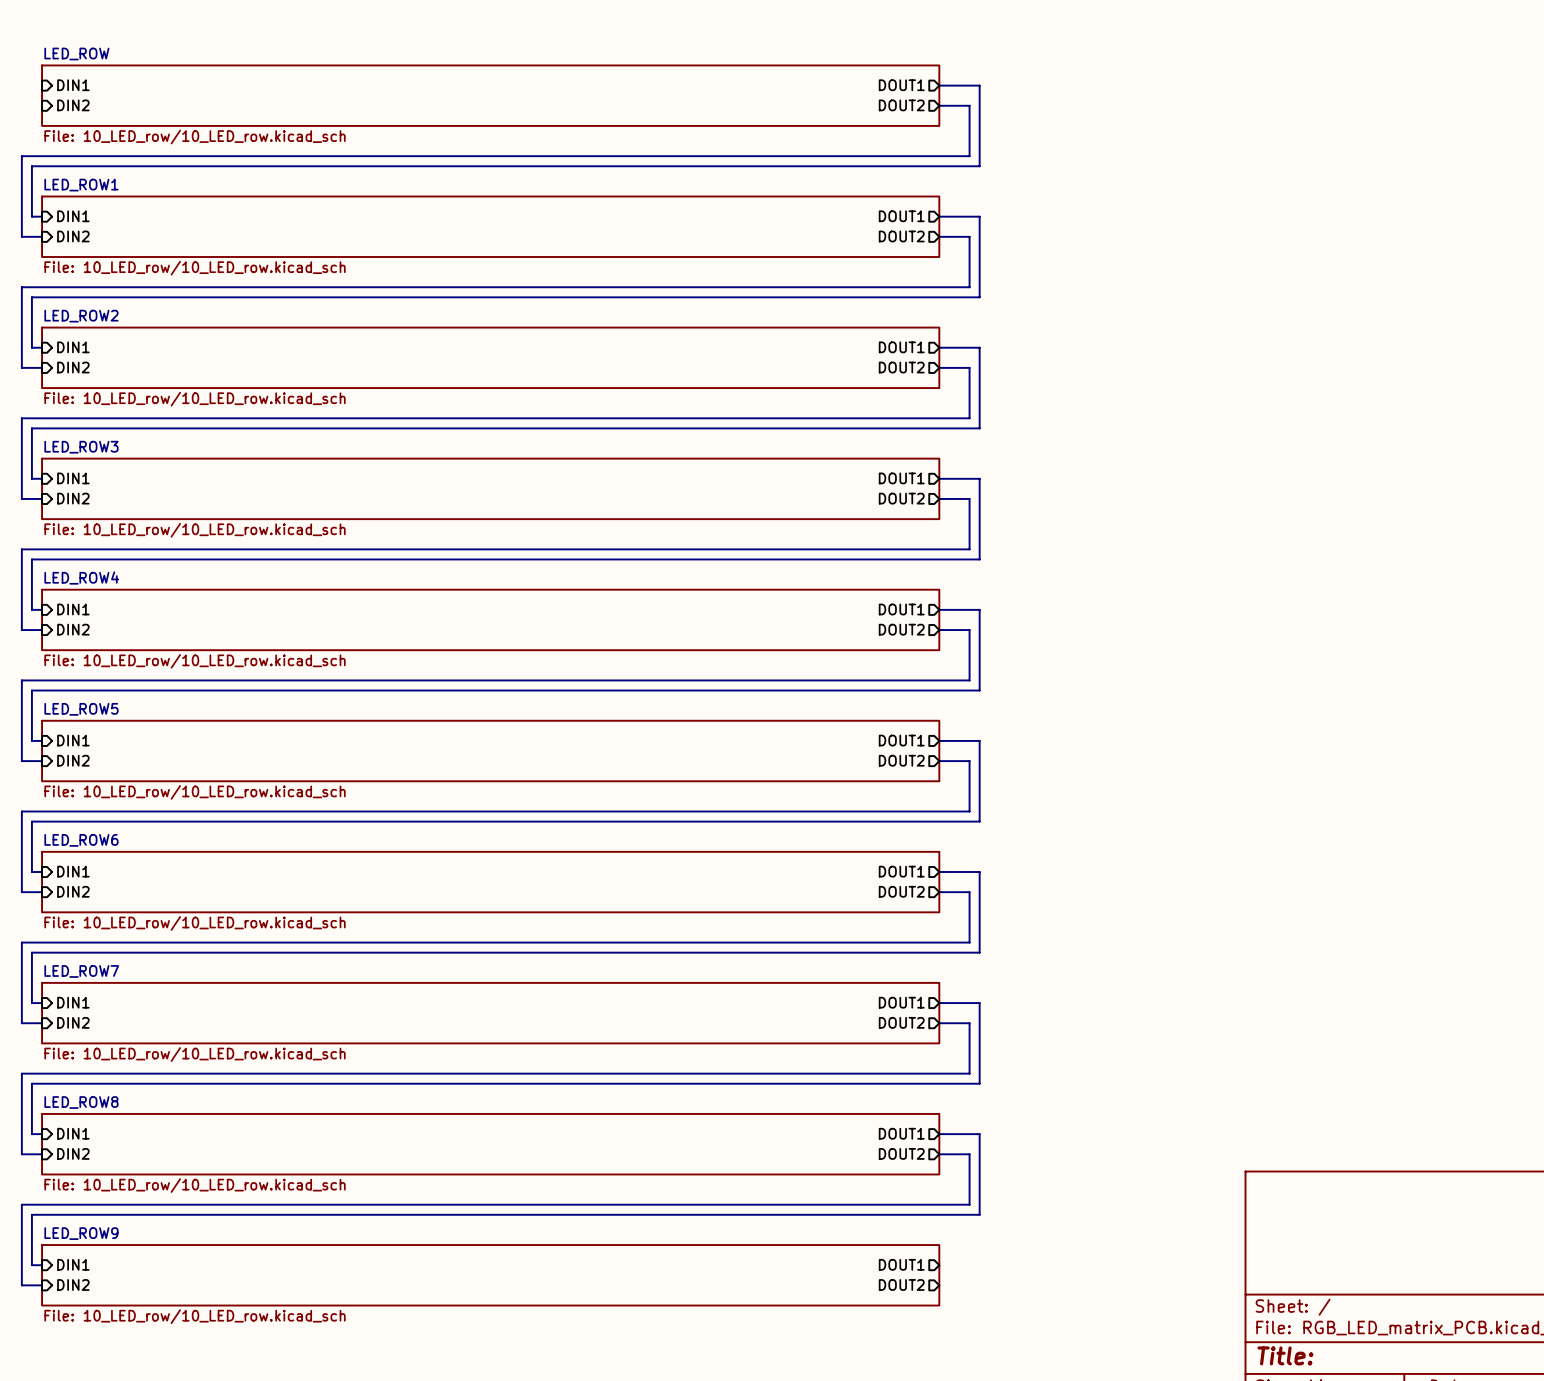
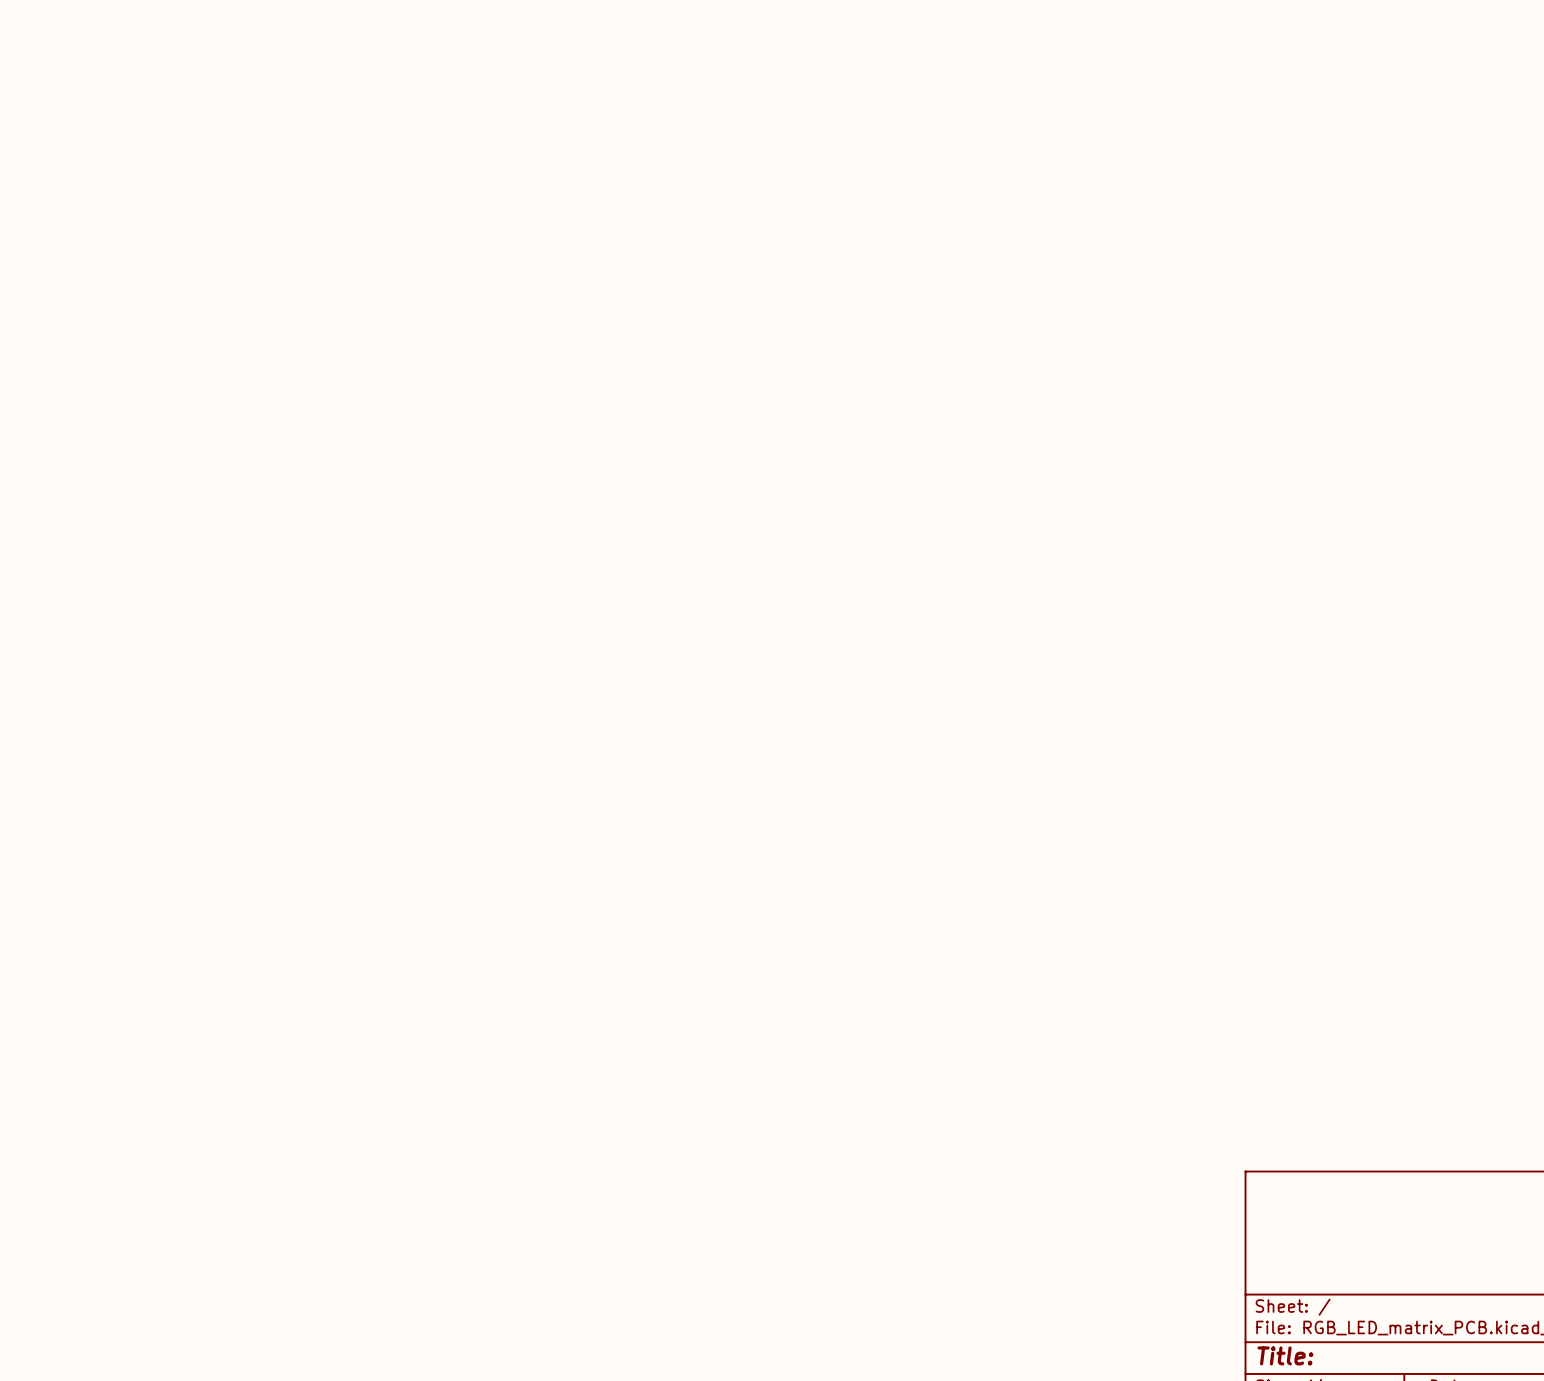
sheet pin: DIN1 (73, 85) -> none
sheet pin: DOUT1 (901, 85) -> none
wire: (939, 85) (979, 85) (979, 166) (31, 166) (31, 216) (42, 216) -> none
sheet LED_ROW: File: 10_LED_row/10_LED_row.kicad_sch (490, 95) -> none
sheet pin: DIN2 (73, 105) -> none
sheet pin: DOUT2 (901, 105) -> none
wire: (939, 105) (969, 105) (969, 156) (21, 156) (21, 236) (42, 236) -> none
sheet pin: DIN1 (73, 216) -> none
sheet pin: DOUT1 (901, 216) -> none
wire: (939, 216) (979, 216) (979, 297) (31, 297) (31, 347) (42, 347) -> none
sheet LED_ROW1: File: 10_LED_row/10_LED_row.kicad_sch (490, 226) -> none
sheet pin: DIN2 (73, 236) -> none
sheet pin: DOUT2 (901, 236) -> none
wire: (939, 236) (969, 236) (969, 287) (21, 287) (21, 367) (42, 367) -> none
sheet pin: DIN1 (73, 347) -> none
sheet pin: DOUT1 (901, 347) -> none
wire: (939, 347) (979, 347) (979, 428) (31, 428) (31, 478) (42, 478) -> none
sheet LED_ROW2: File: 10_LED_row/10_LED_row.kicad_sch (490, 357) -> none
sheet pin: DIN2 (73, 367) -> none
sheet pin: DOUT2 (901, 367) -> none
wire: (939, 367) (969, 367) (969, 418) (21, 418) (21, 498) (42, 498) -> none
sheet pin: DIN1 (73, 478) -> none
sheet pin: DOUT1 (901, 478) -> none
wire: (939, 478) (979, 478) (979, 559) (31, 559) (31, 609) (42, 609) -> none
sheet LED_ROW3: File: 10_LED_row/10_LED_row.kicad_sch (490, 488) -> none
sheet pin: DIN2 (73, 498) -> none
sheet pin: DOUT2 (901, 498) -> none
wire: (939, 498) (969, 498) (969, 549) (21, 549) (21, 630) (42, 630) -> none
sheet pin: DIN1 (73, 609) -> none
sheet pin: DOUT1 (901, 609) -> none
wire: (939, 609) (979, 609) (979, 690) (31, 690) (31, 740) (42, 740) -> none
sheet LED_ROW4: File: 10_LED_row/10_LED_row.kicad_sch (490, 619) -> none
sheet pin: DIN2 (73, 629) -> none
sheet pin: DOUT2 (901, 629) -> none
wire: (939, 630) (969, 630) (969, 680) (21, 680) (21, 761) (42, 761) -> none
sheet pin: DIN1 (73, 740) -> none
sheet pin: DOUT1 (901, 740) -> none
wire: (939, 740) (979, 740) (979, 821) (31, 821) (31, 872) (42, 872) -> none
sheet LED_ROW5: File: 10_LED_row/10_LED_row.kicad_sch (490, 751) -> none
sheet pin: DIN2 (73, 760) -> none
sheet pin: DOUT2 (901, 760) -> none
wire: (939, 761) (969, 761) (969, 811) (21, 811) (21, 892) (42, 892) -> none
sheet pin: DIN1 (73, 871) -> none
sheet pin: DOUT1 (901, 871) -> none
wire: (939, 872) (979, 872) (979, 952) (31, 952) (31, 1003) (42, 1003) -> none
sheet LED_ROW6: File: 10_LED_row/10_LED_row.kicad_sch (490, 882) -> none
sheet pin: DIN2 (73, 891) -> none
sheet pin: DOUT2 (901, 891) -> none
wire: (939, 892) (969, 892) (969, 942) (21, 942) (21, 1023) (42, 1023) -> none
sheet pin: DIN1 (73, 1002) -> none
sheet pin: DOUT1 (901, 1002) -> none
wire: (939, 1003) (979, 1003) (979, 1083) (31, 1083) (31, 1134) (42, 1134) -> none
sheet LED_ROW7: File: 10_LED_row/10_LED_row.kicad_sch (490, 1013) -> none
sheet pin: DIN2 (73, 1022) -> none
sheet pin: DOUT2 (901, 1022) -> none
wire: (939, 1023) (969, 1023) (969, 1073) (21, 1073) (21, 1154) (42, 1154) -> none
sheet pin: DIN1 (73, 1133) -> none
sheet pin: DOUT1 (901, 1133) -> none
wire: (939, 1134) (979, 1134) (979, 1214) (31, 1214) (31, 1265) (42, 1265) -> none
sheet LED_ROW8: File: 10_LED_row/10_LED_row.kicad_sch (490, 1144) -> none
sheet pin: DIN2 (73, 1153) -> none
sheet pin: DOUT2 (901, 1153) -> none
wire: (939, 1154) (969, 1154) (969, 1204) (21, 1204) (21, 1285) (42, 1285) -> none
sheet pin: DIN1 (73, 1264) -> none
sheet pin: DOUT1 (901, 1264) -> none
sheet LED_ROW9: File: 10_LED_row/10_LED_row.kicad_sch (490, 1275) -> none
sheet pin: DIN2 (73, 1284) -> none
sheet pin: DOUT2 (901, 1284) -> none

